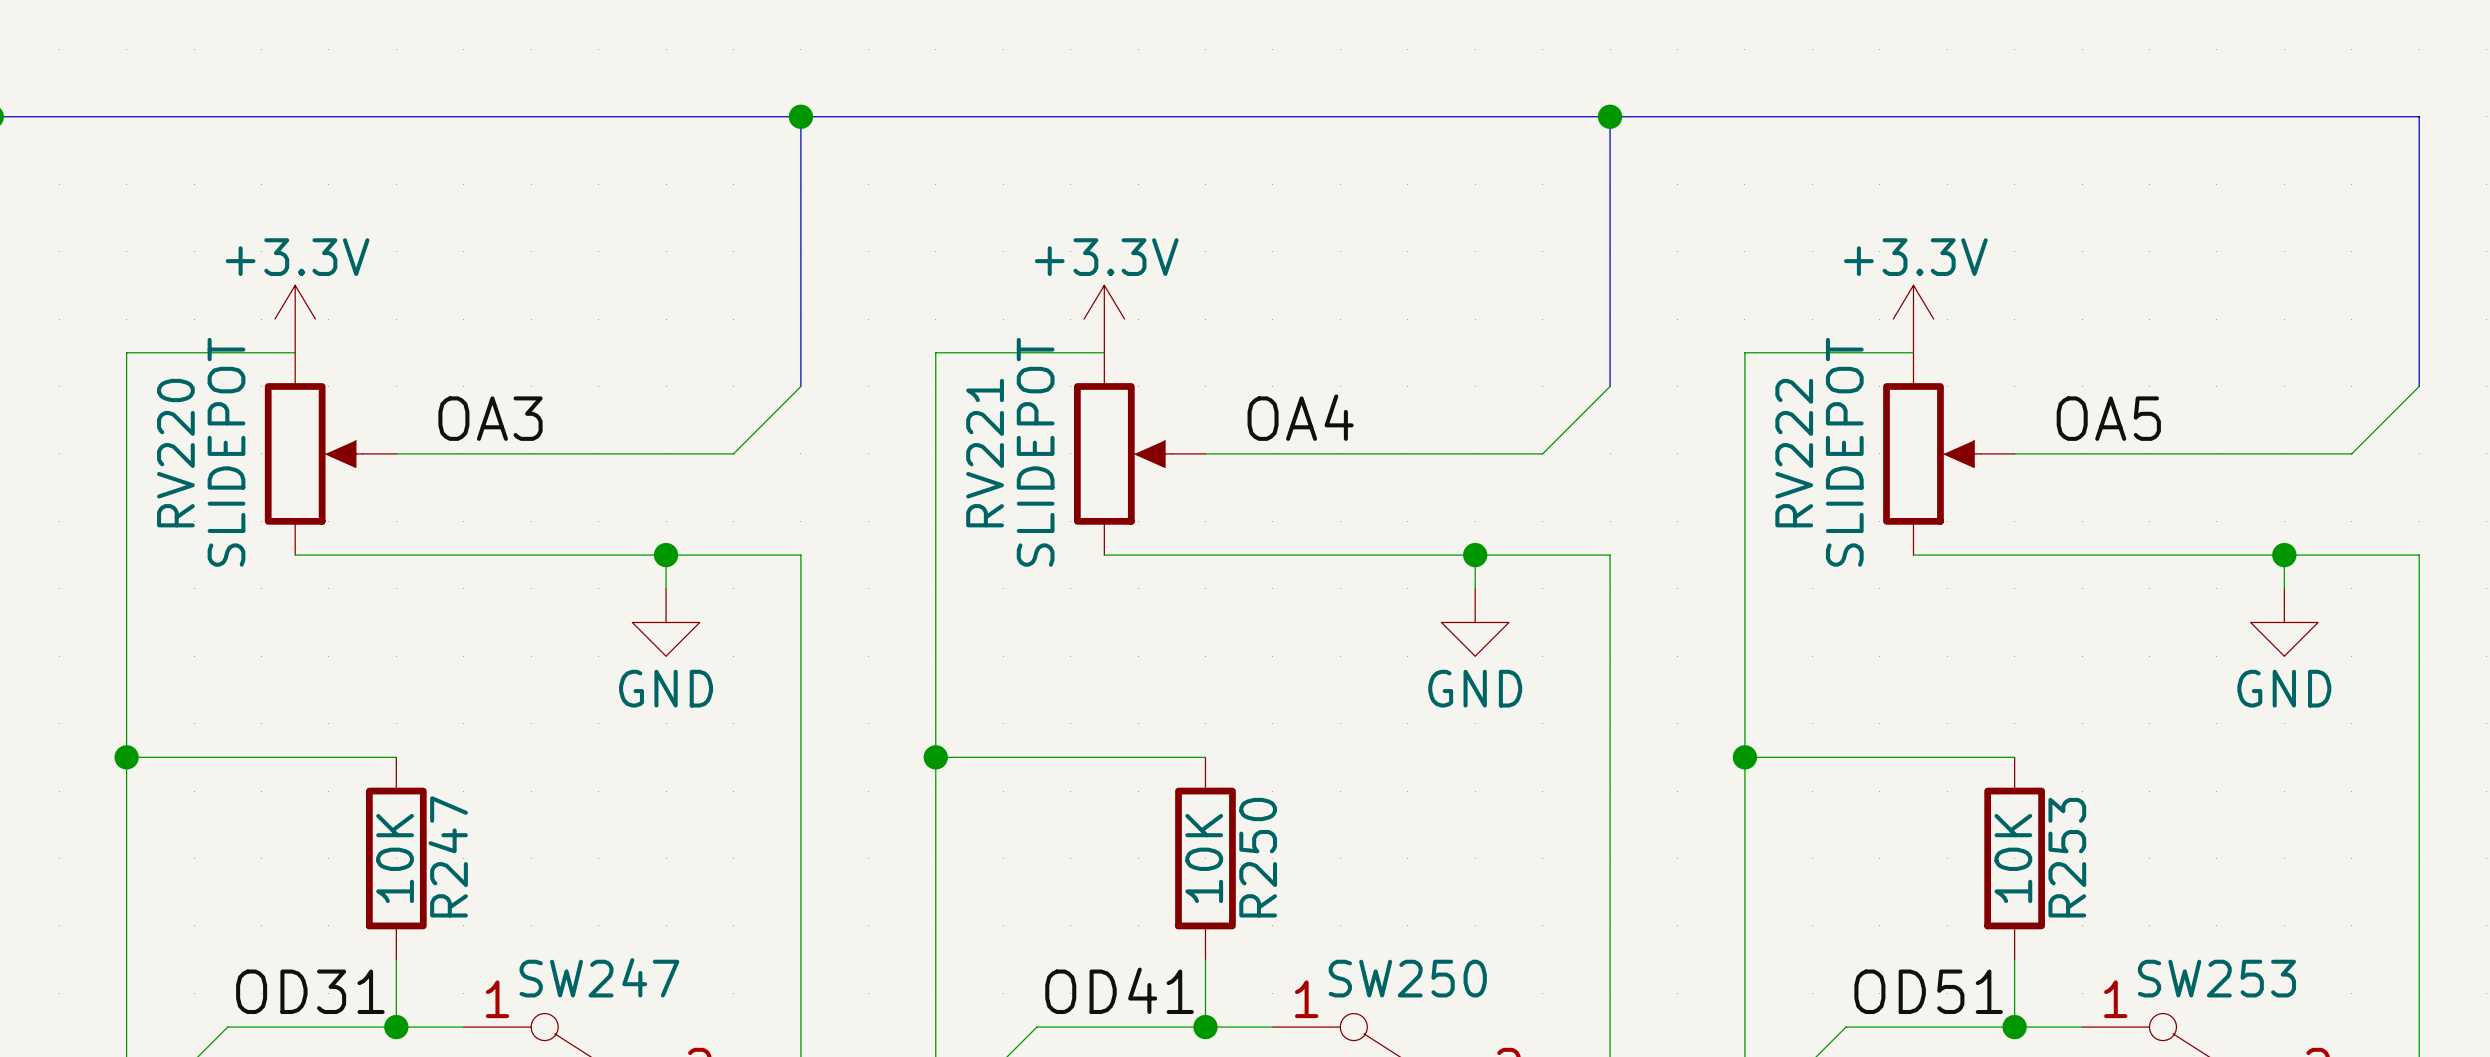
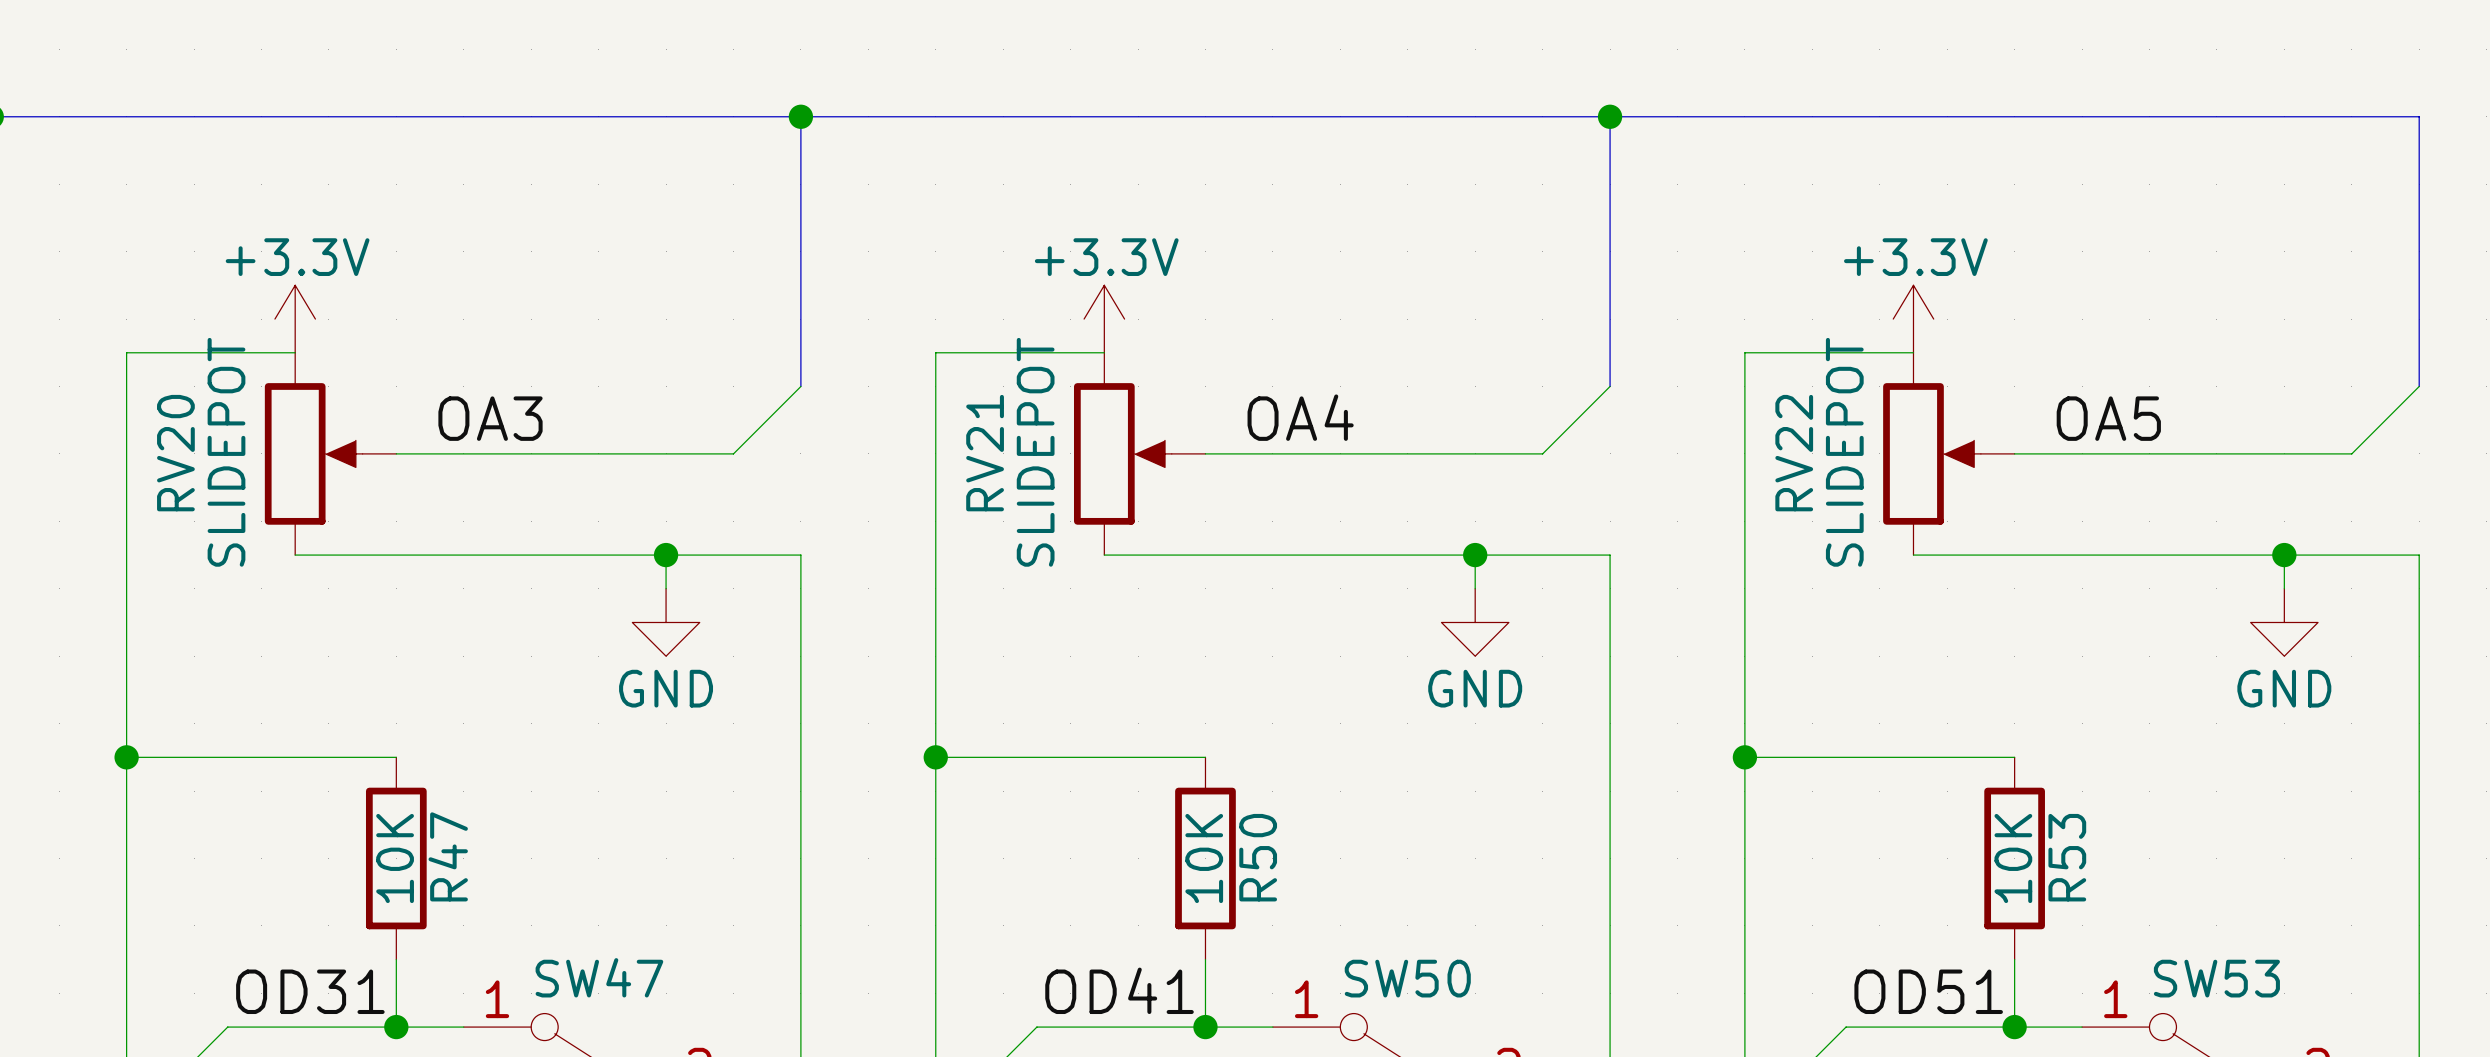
RV220 name: RV220 (175, 453) -> RV20 (175, 453)
RV221 name: RV221 (985, 453) -> RV21 (985, 453)
RV222 name: RV222 (1794, 453) -> RV22 (1794, 453)
R247 name: R247 (448, 856) -> R47 (448, 856)
R250 name: R250 (1258, 857) -> R50 (1258, 857)
R253 name: R253 (2067, 857) -> R53 (2067, 857)
SW247 name: SW247 (599, 977) -> SW47 (599, 977)
SW250 name: SW250 (1407, 978) -> SW50 (1407, 978)
SW253 name: SW253 (2216, 978) -> SW53 (2216, 978)

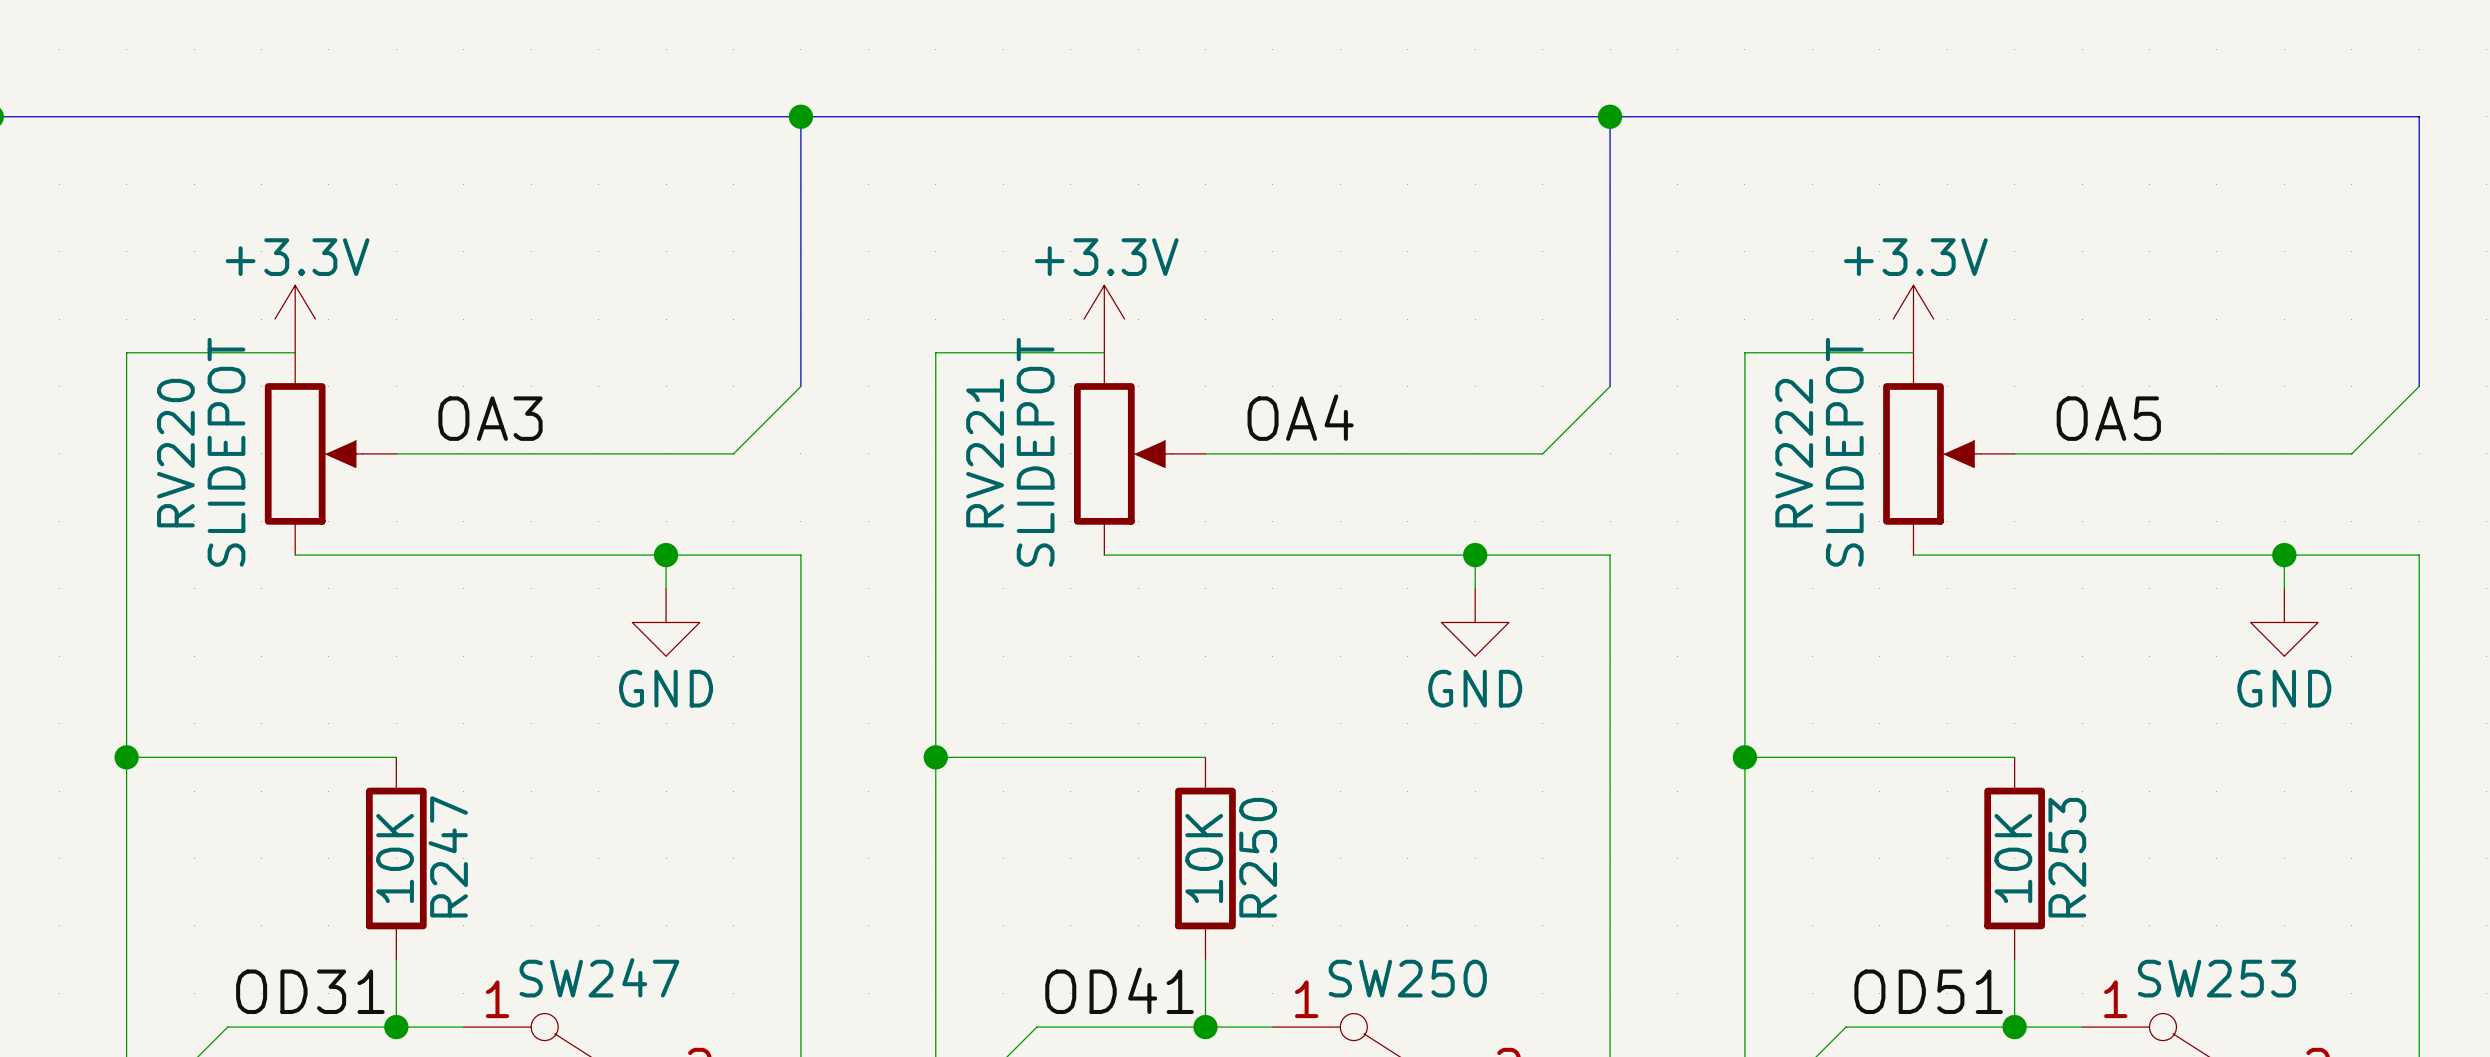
RV20 name: RV20 (175, 453) -> RV220 (175, 453)
RV21 name: RV21 (985, 453) -> RV221 (985, 453)
RV22 name: RV22 (1794, 453) -> RV222 (1794, 453)
R47 name: R47 (448, 856) -> R247 (448, 856)
R50 name: R50 (1258, 857) -> R250 (1258, 857)
R53 name: R53 (2067, 857) -> R253 (2067, 857)
SW47 name: SW47 (599, 977) -> SW247 (599, 977)
SW50 name: SW50 (1407, 978) -> SW250 (1407, 978)
SW53 name: SW53 (2216, 978) -> SW253 (2216, 978)

